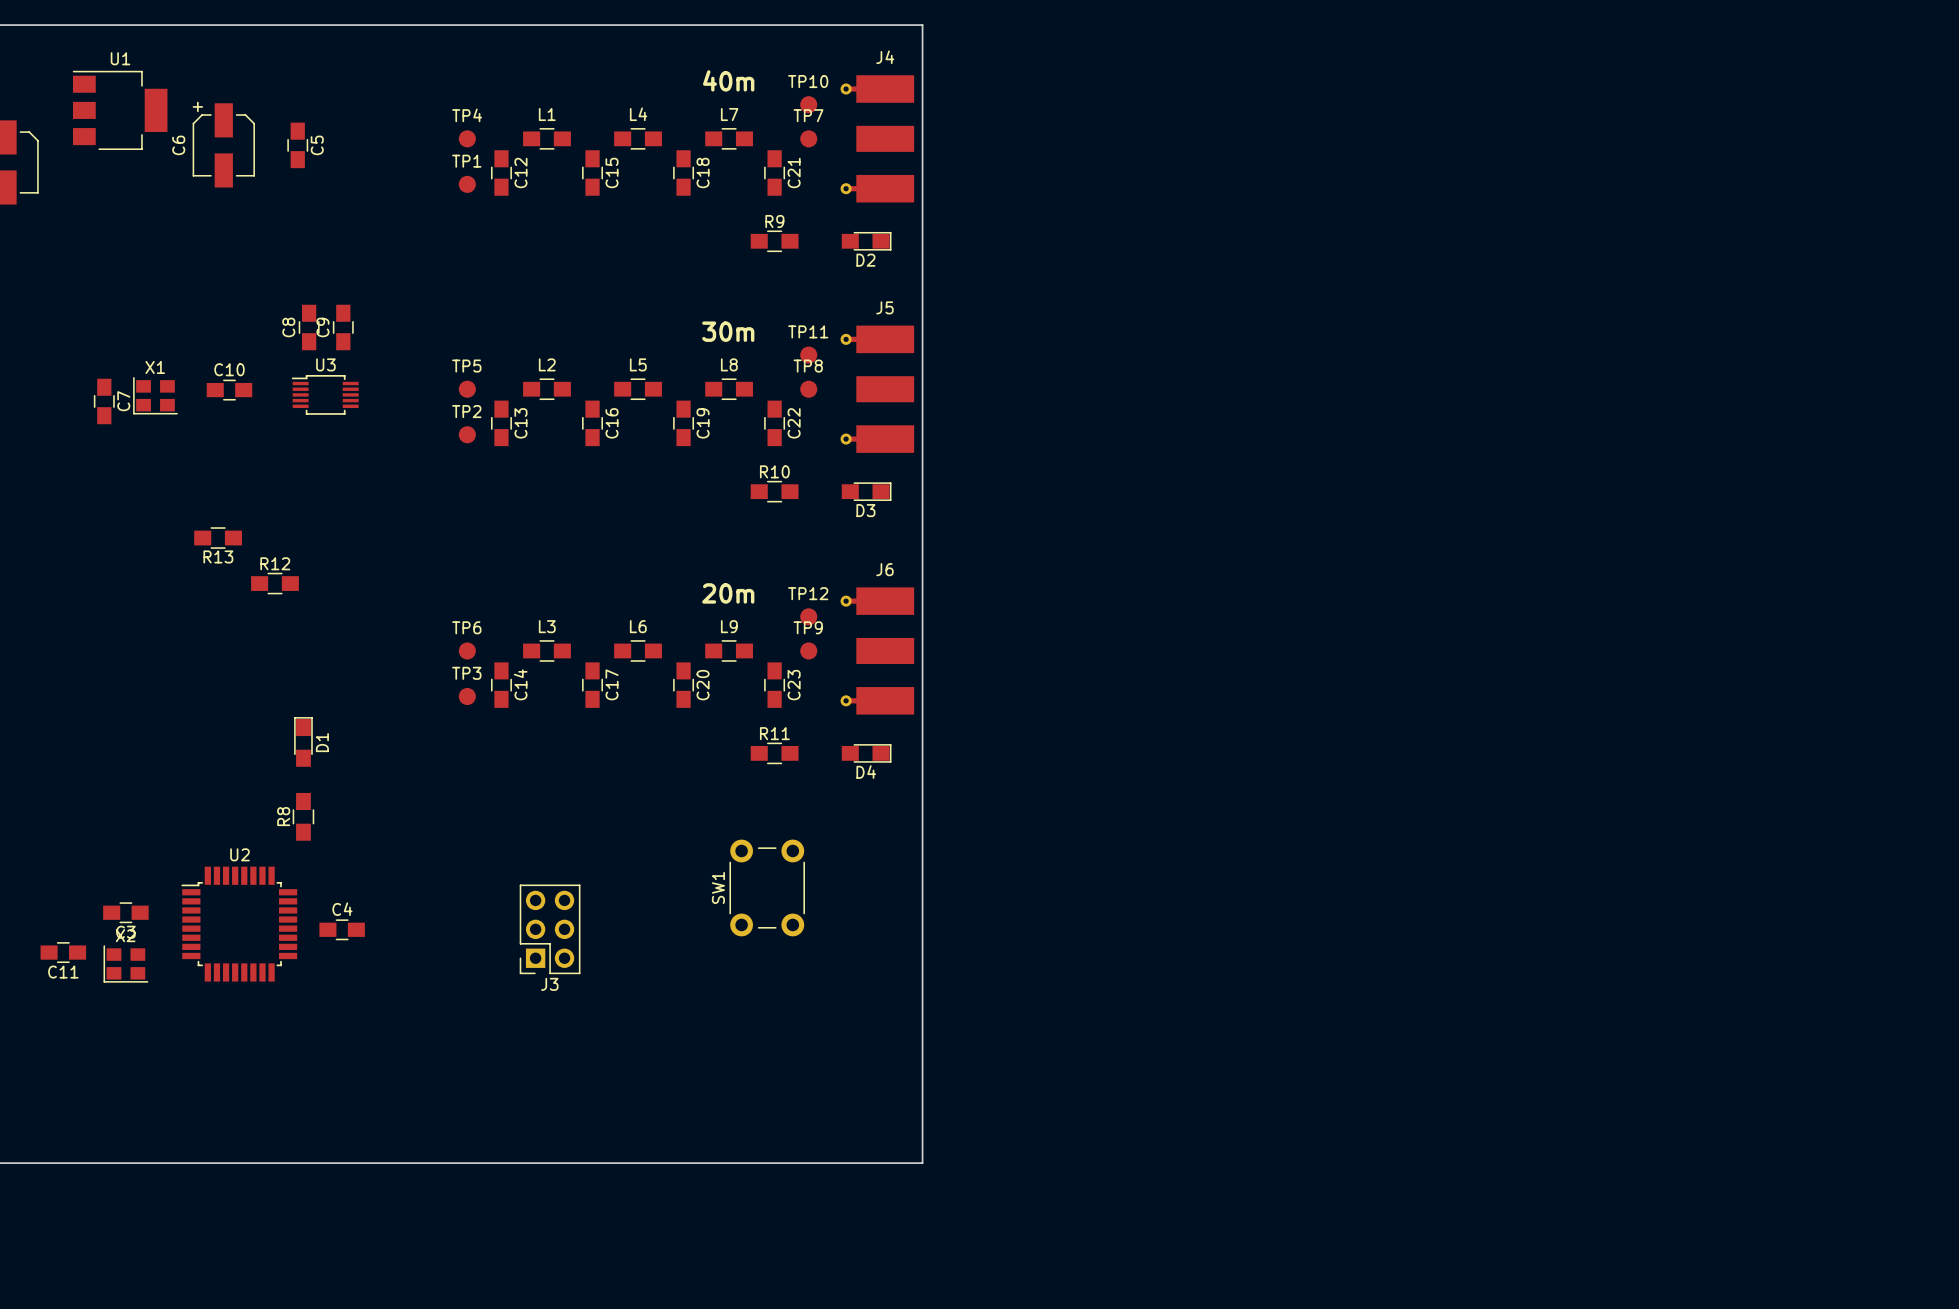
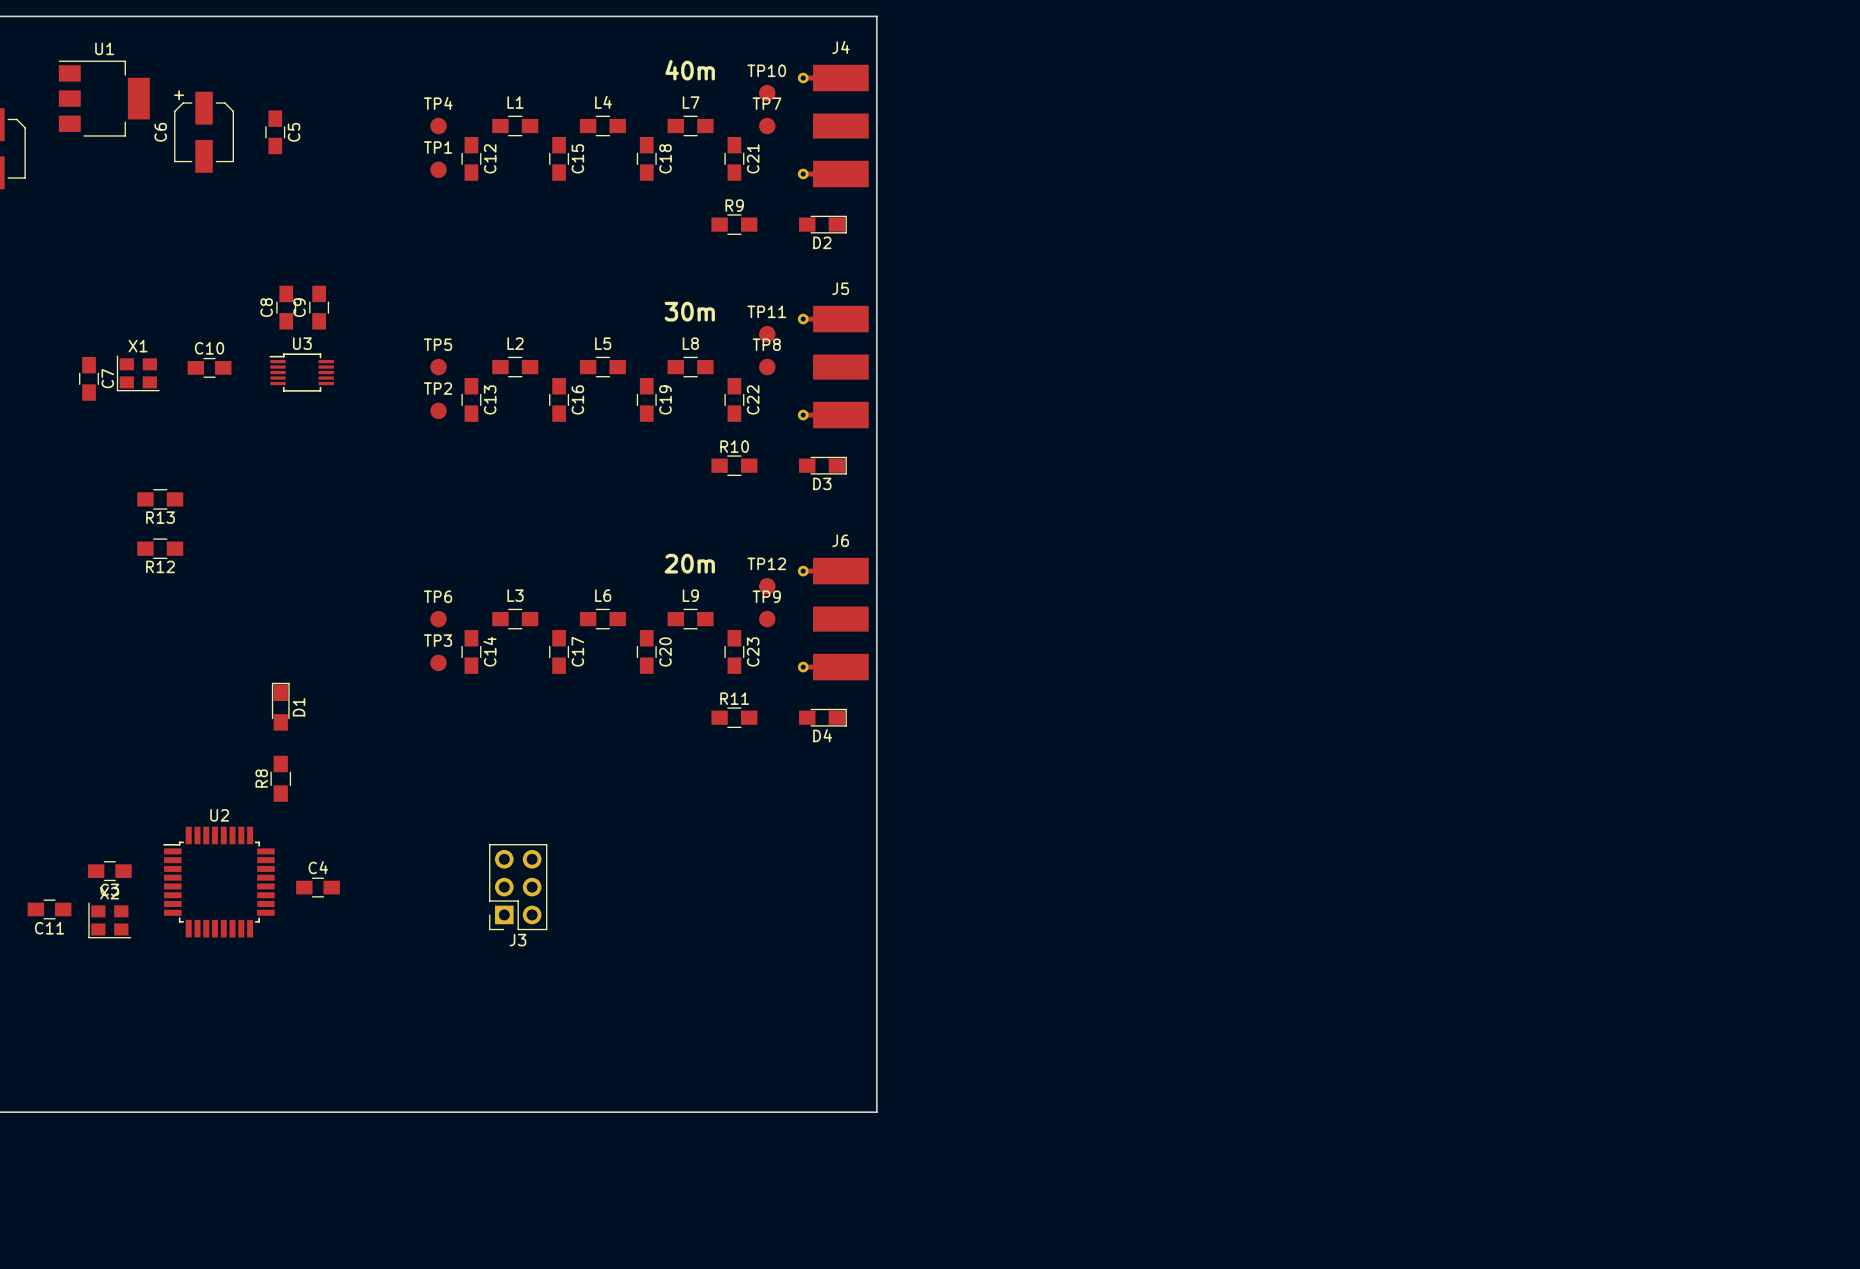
R13 position: (218, 538) -> (160, 499)
R12 name position: R12 (275, 563) -> R12 (160, 566)
R12 position: (275, 583) -> (160, 548)
SW1: (767, 887) -> none

